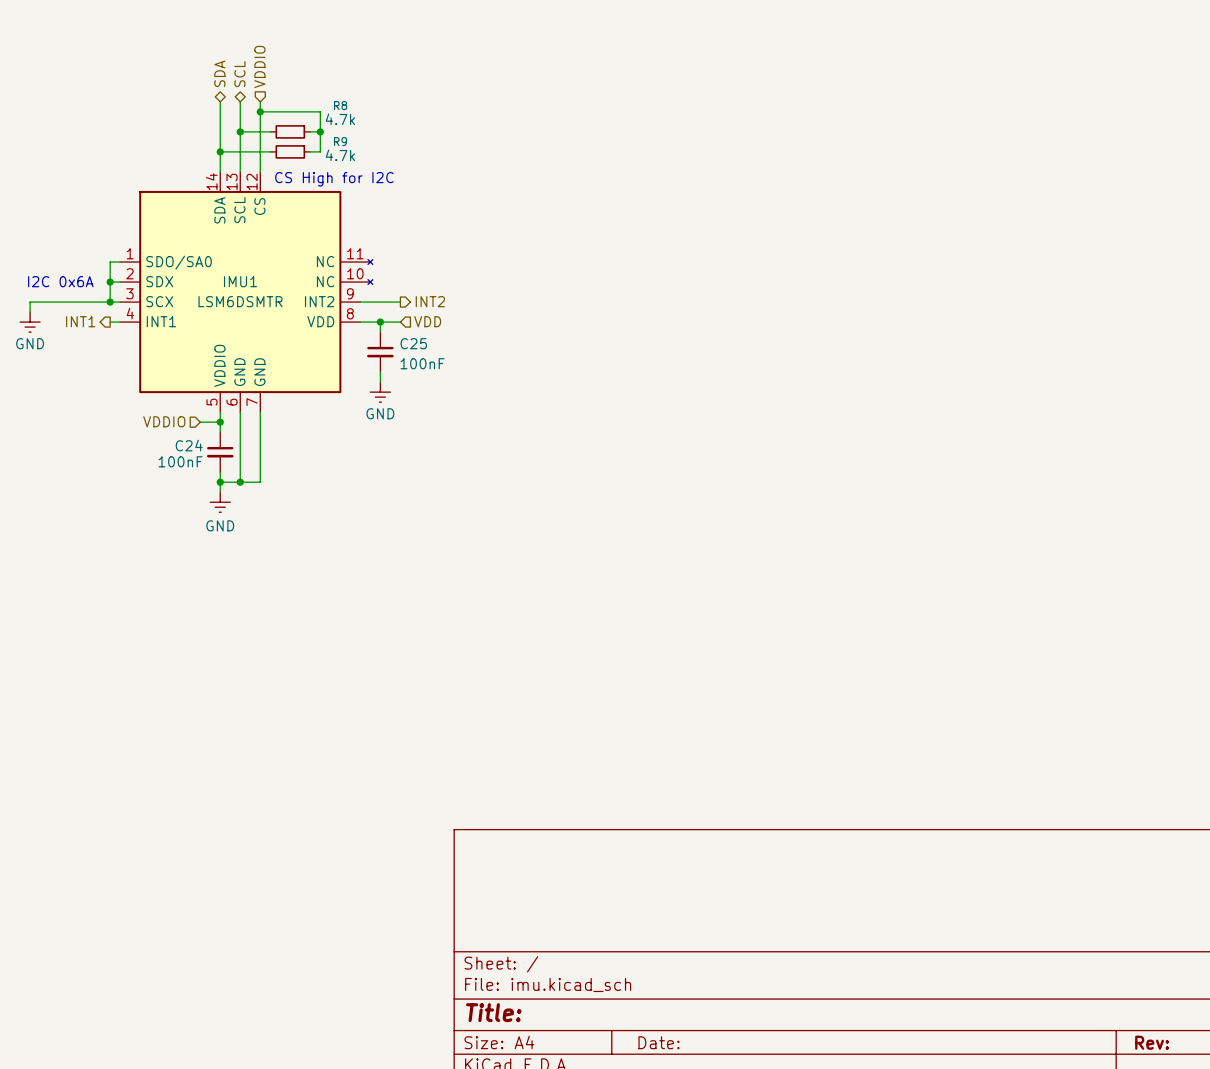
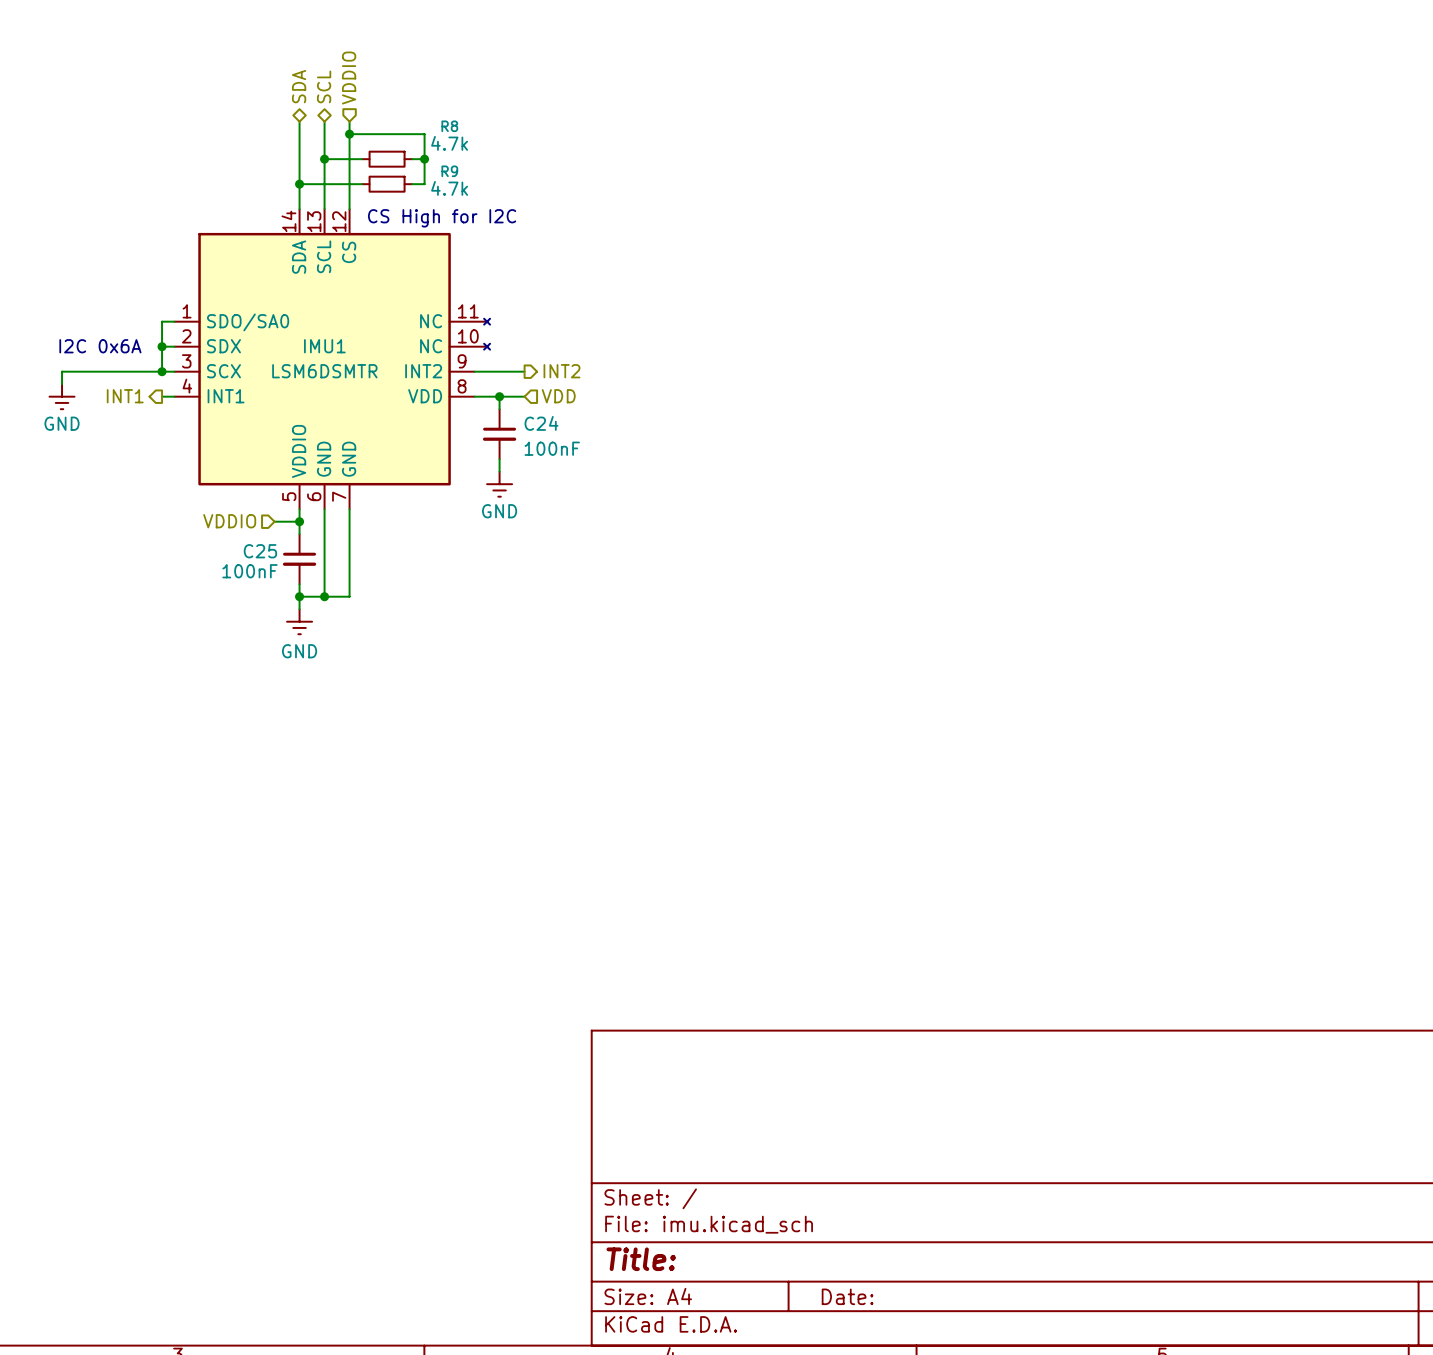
C25 name: C25 (413, 343) -> C24 (541, 423)
C24 name: C24 (189, 445) -> C25 (260, 551)

